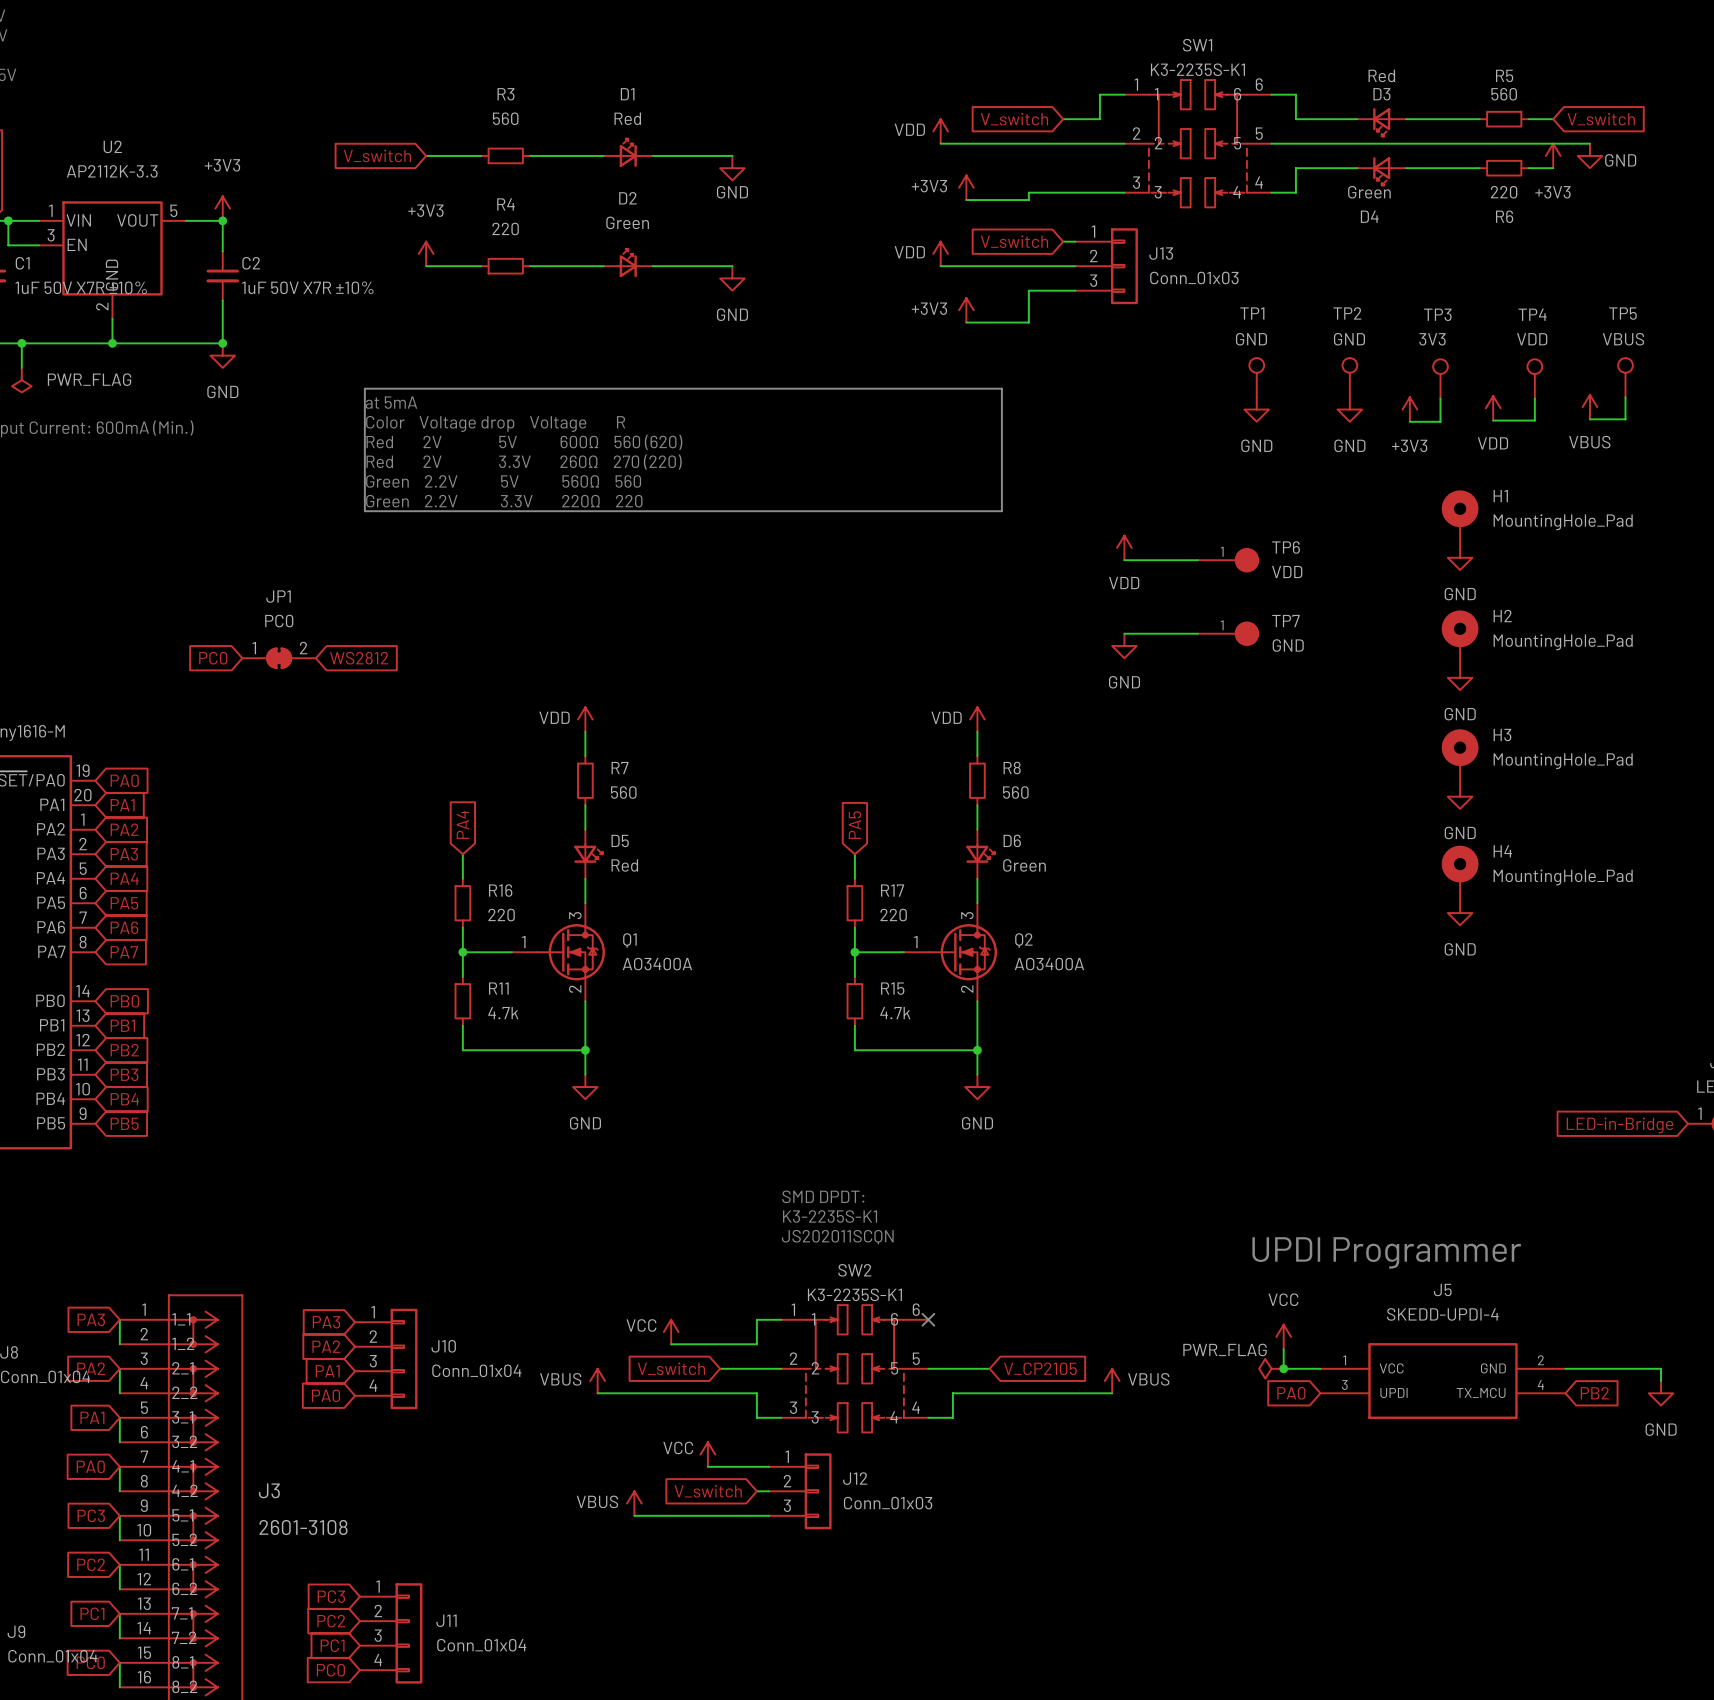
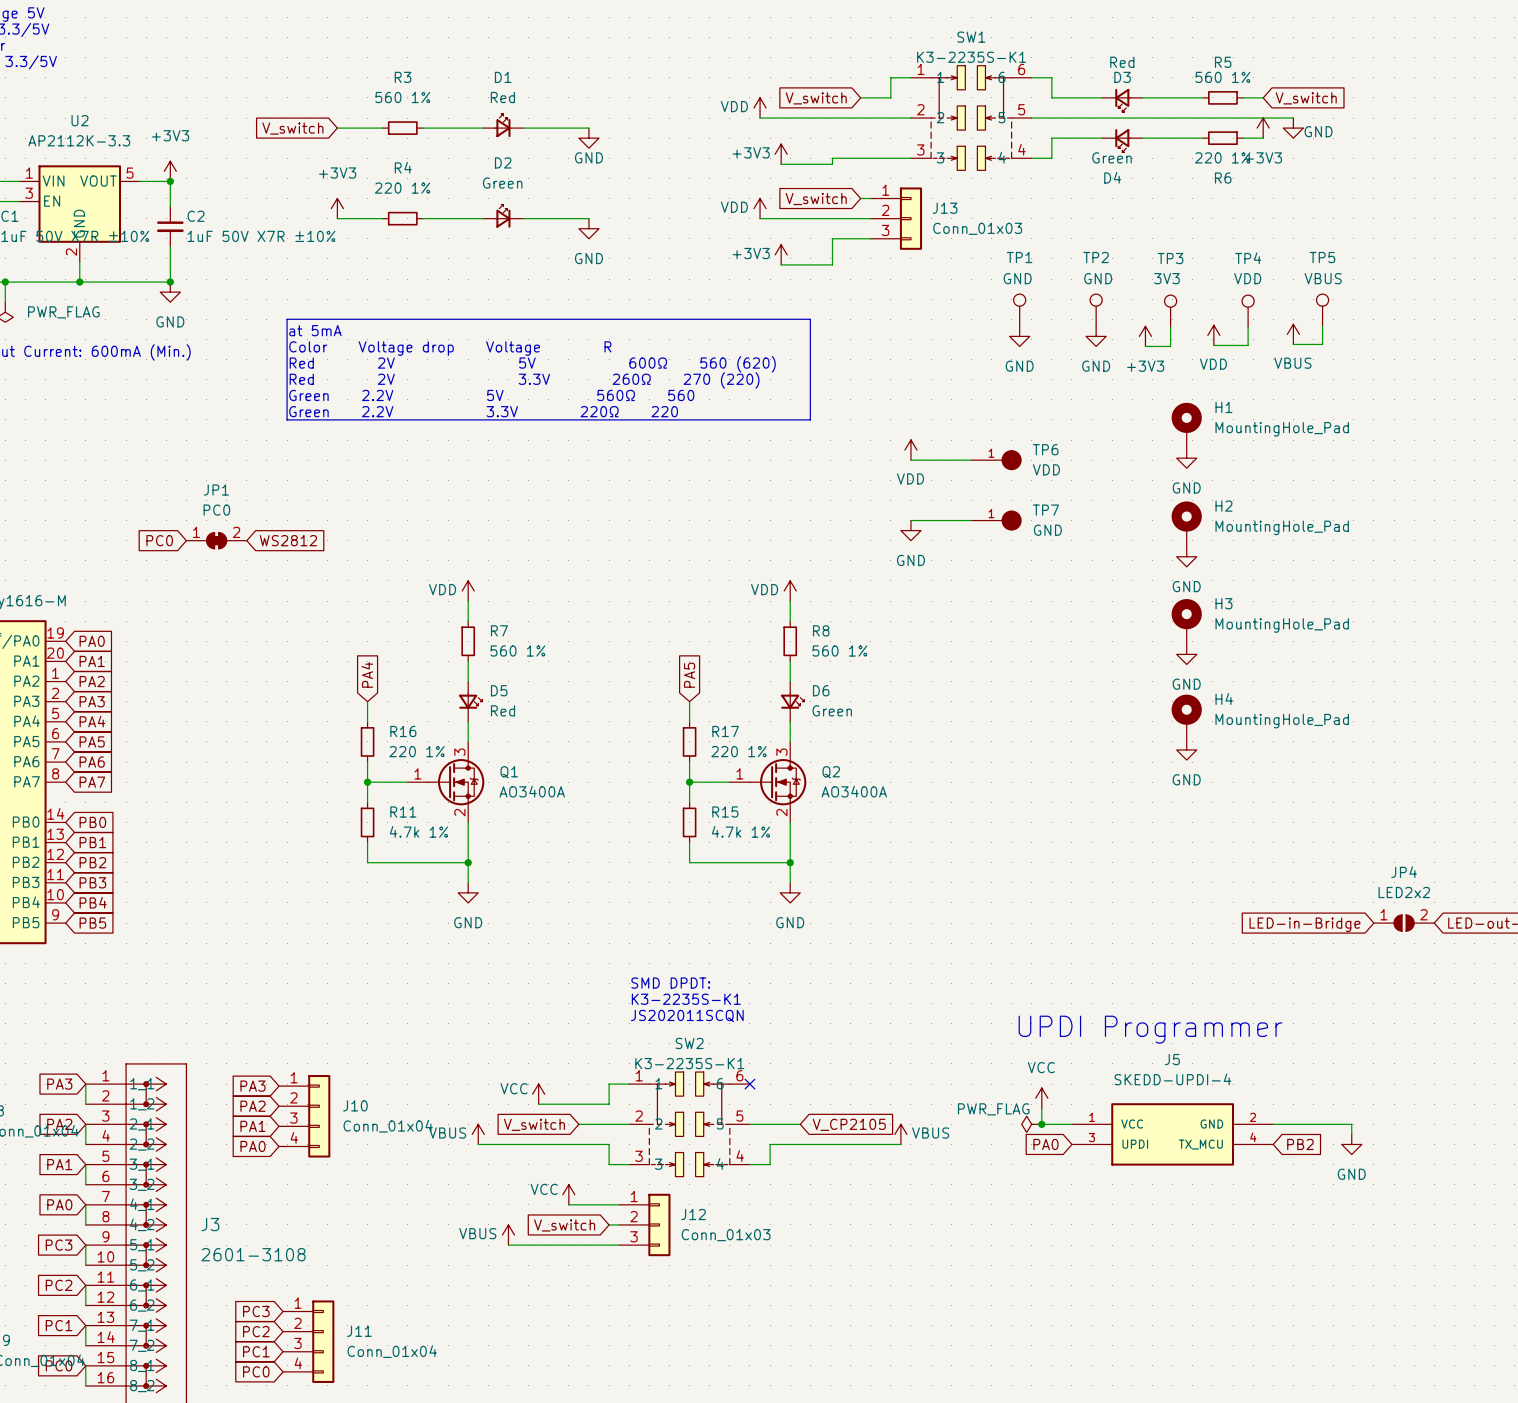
R5 value: 560 (1504, 94) -> 560 1% (1222, 77)
R3 value: 560 (505, 118) -> 560 1% (402, 97)
R6 value: 220 (1504, 192) -> 220 1% (1222, 157)
R4 value: 220 (505, 228) -> 220 1% (402, 188)
R7 value: 560 (623, 792) -> 560 1% (517, 650)
R8 value: 560 (1015, 792) -> 560 1% (839, 650)
R16 value: 220 (501, 915) -> 220 1% (417, 751)
R17 value: 220 (893, 915) -> 220 1% (739, 751)
R11 value: 4.7k (503, 1013) -> 4.7k 1% (418, 831)
R15 value: 4.7k (895, 1013) -> 4.7k 1% (740, 831)

